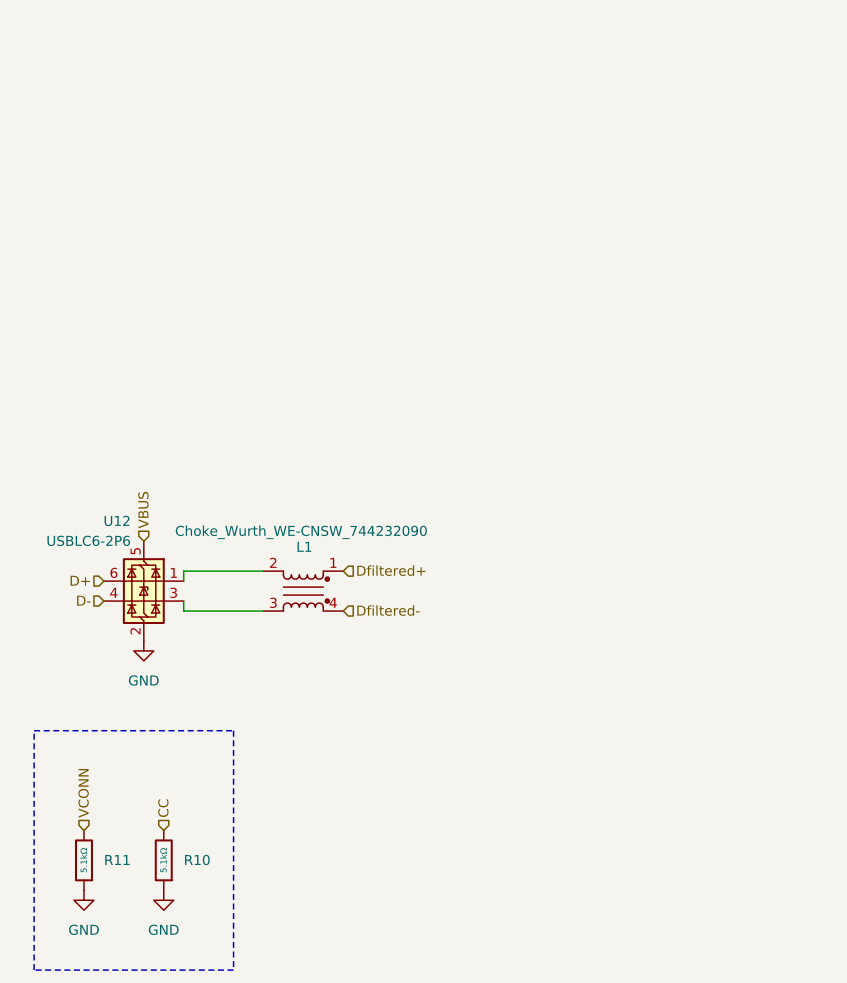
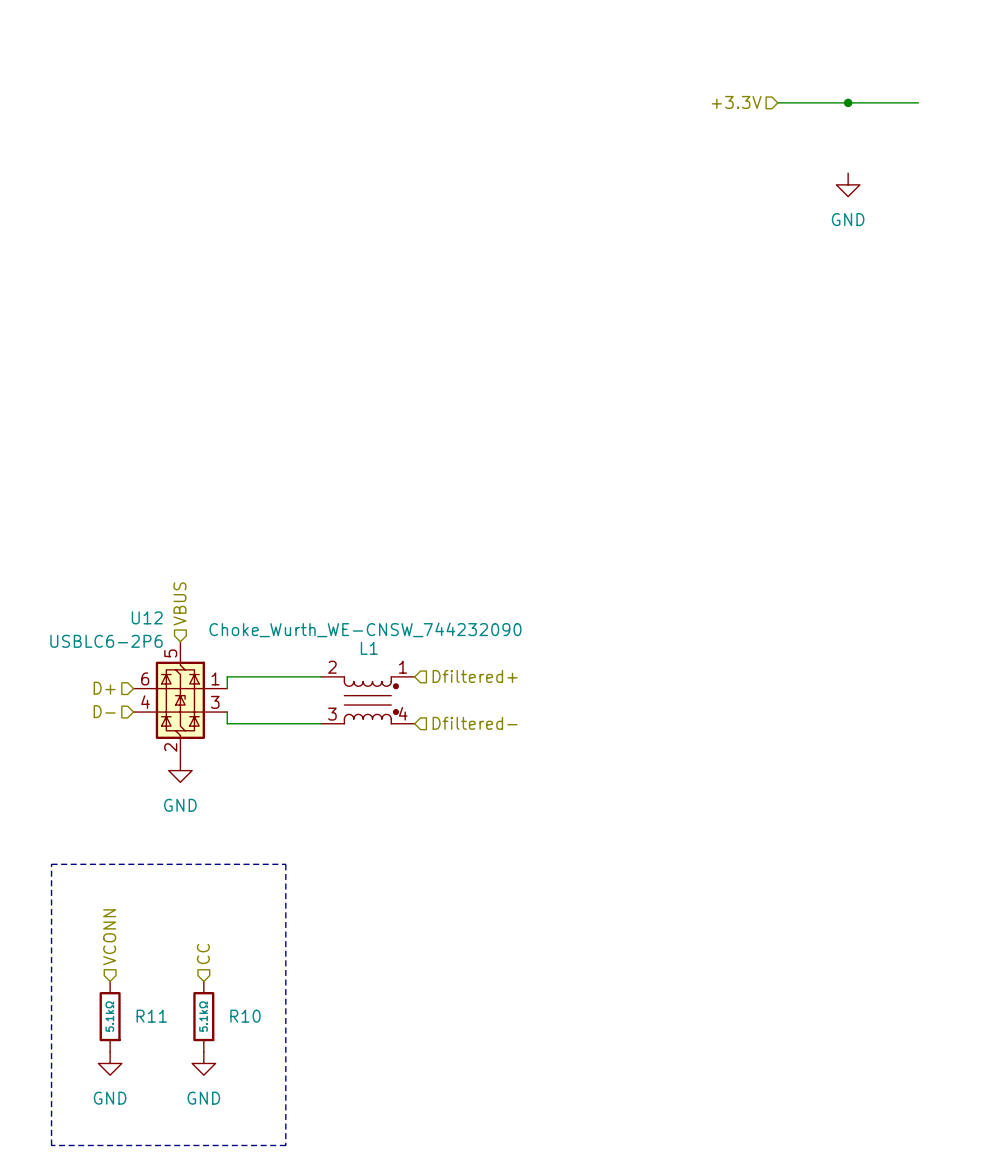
hierarchical label: none -> +3.3V (736, 102)
wire: none -> (777, 102) (918, 102)
junction: none -> (848, 102)
power symbol: none -> GND (848, 184)

